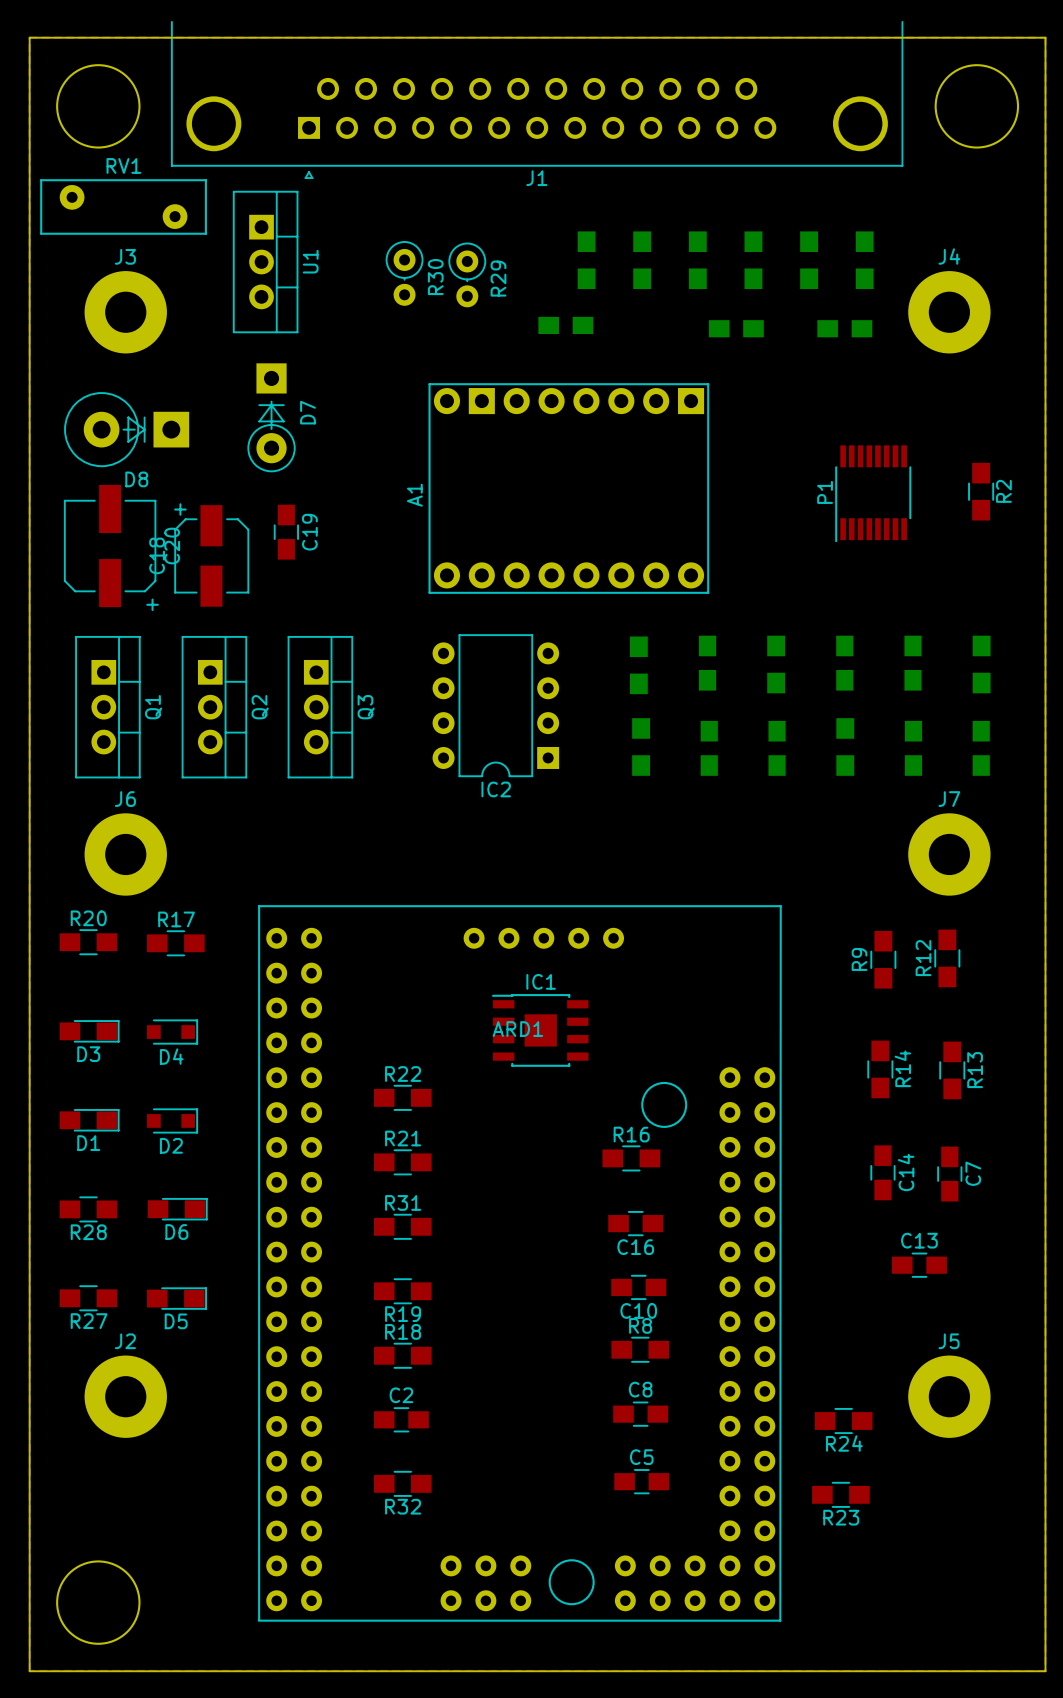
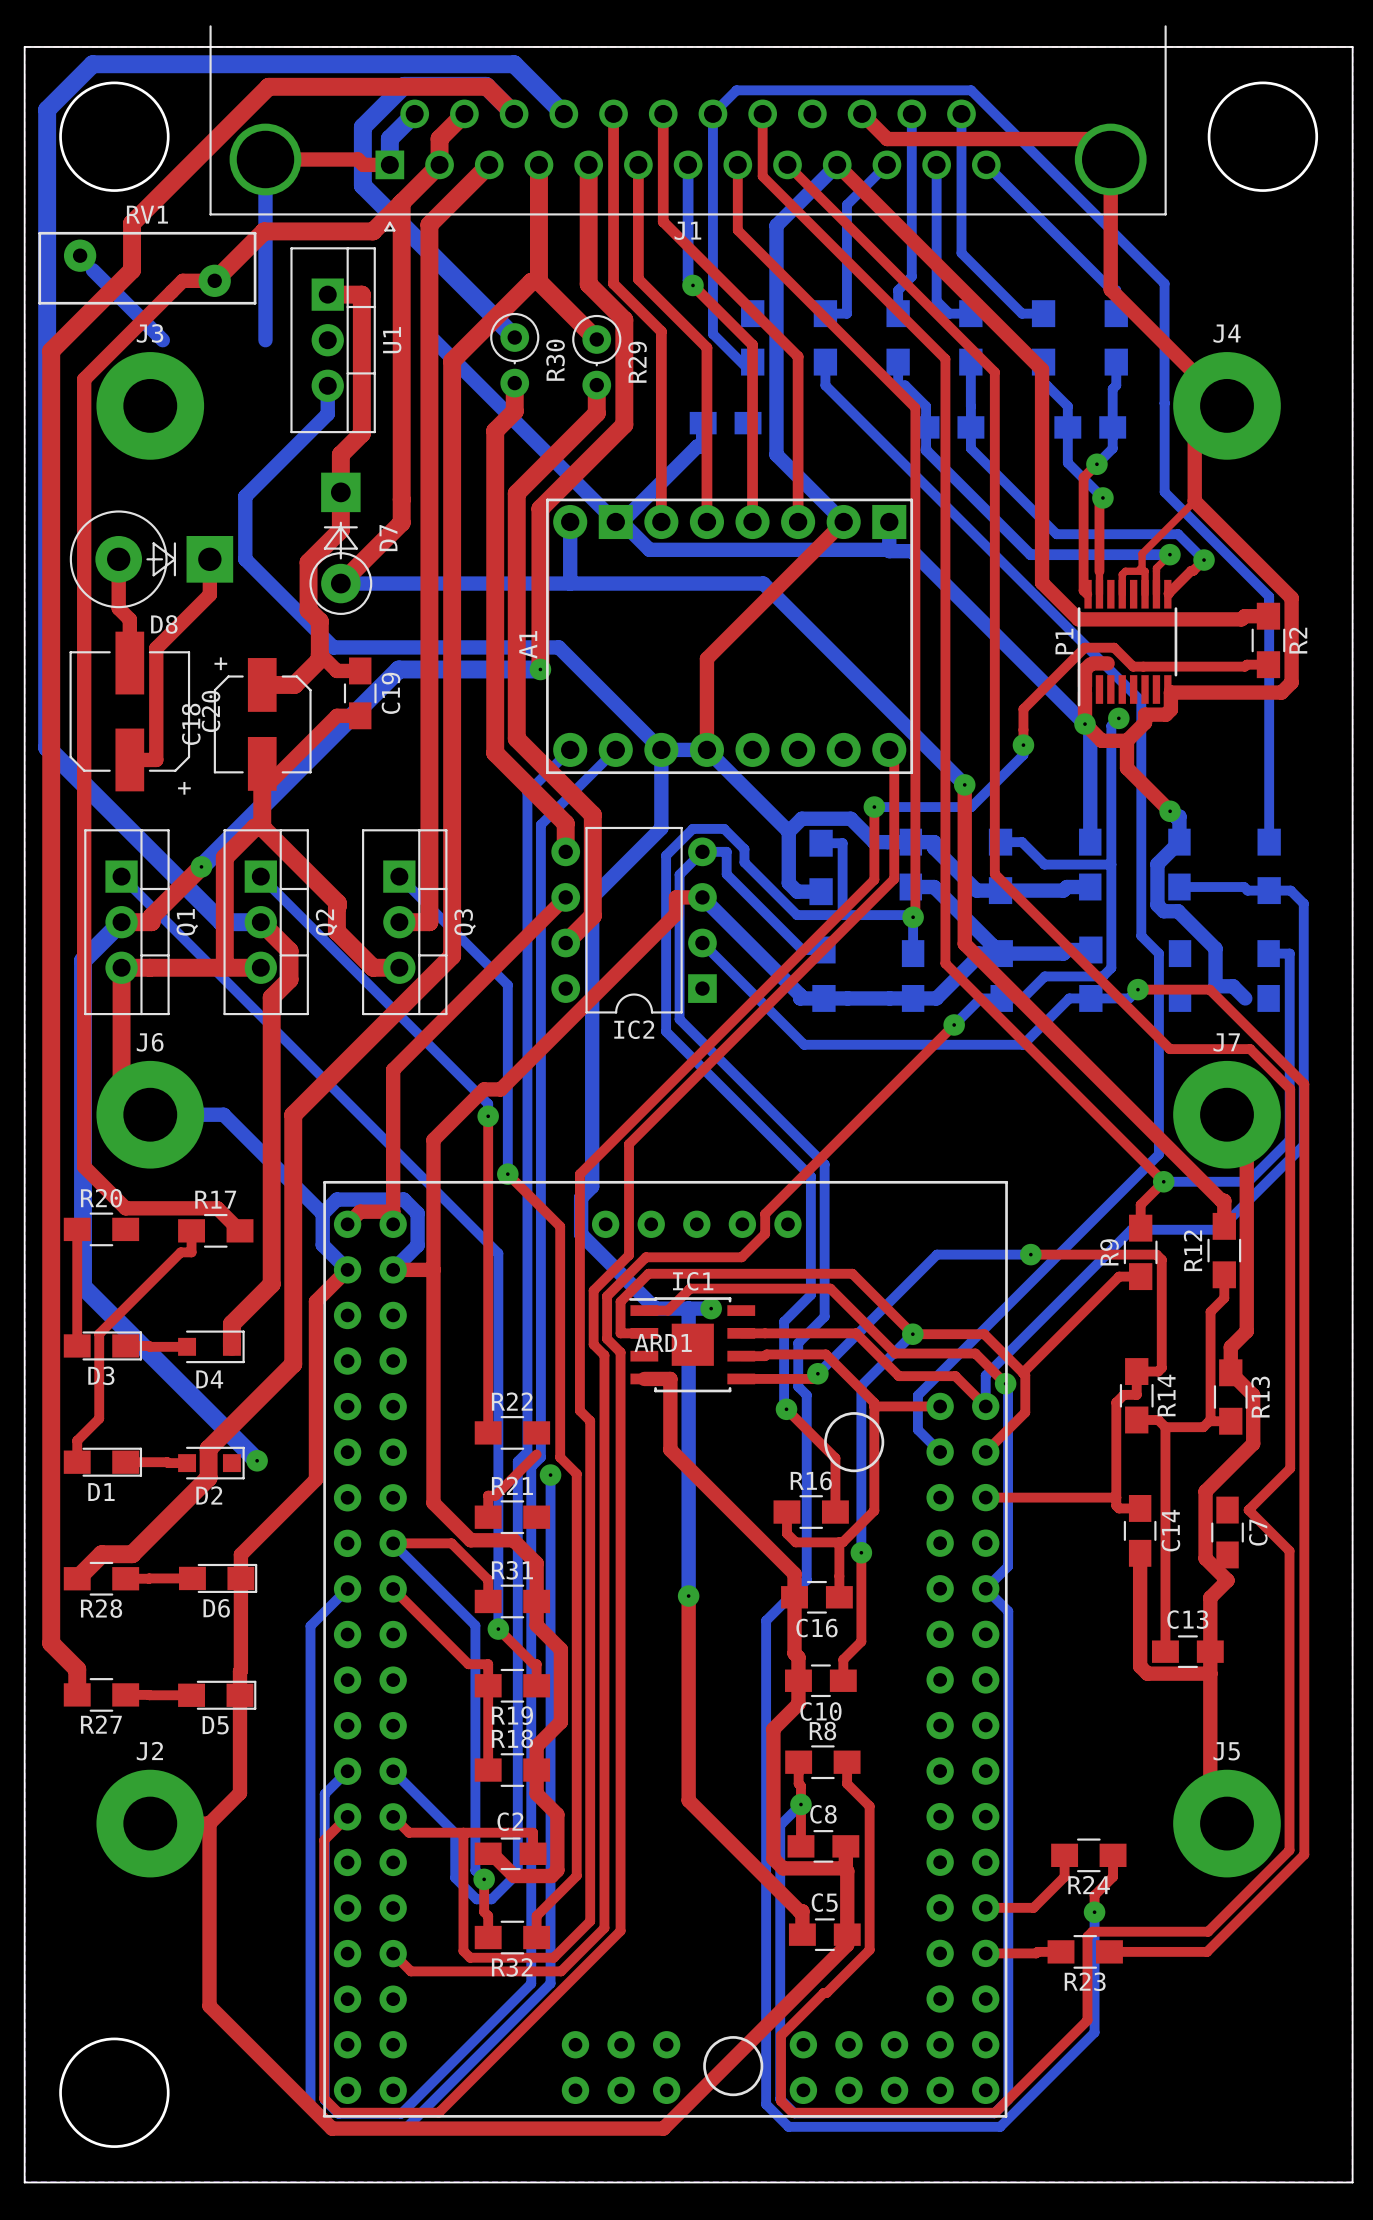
bottom track: none -> (414, 113) (389, 138) (389, 164)
top track: none -> (464, 113) (439, 138) (439, 164) (373, 231) (264, 231) (214, 280) (182, 280) (84, 379) (84, 1166) (125, 1208) (217, 1208) (240, 1230)
bottom track: none -> (514, 113) (486, 85) (404, 85) (362, 127) (362, 185) (514, 337)
top track: none -> (514, 113) (487, 86) (268, 86) (132, 223) (132, 270) (51, 350) (51, 1643) (77, 1669) (77, 1694)
bottom track: none -> (563, 113) (514, 64) (92, 64) (47, 109) (47, 747) (221, 922) (260, 922)
top track: none -> (613, 113) (613, 283) (661, 331) (661, 522)
top track: none -> (663, 113) (663, 221) (798, 356) (798, 522)
top track: none -> (762, 113) (762, 176) (945, 359) (945, 963) (1163, 1181) (1140, 1204) (1140, 1228)
top track: none -> (862, 113) (887, 139) (1090, 139) (1110, 159) (1110, 289) (1227, 405) (1194, 438) (1194, 501)
bottom track: none -> (911, 113) (911, 276) (898, 290) (898, 313)
bottom track: none -> (961, 113) (961, 253) (1022, 313) (1043, 313)
bottom track: none -> (265, 159) (265, 340)
top track: none -> (265, 159) (357, 159) (363, 164) (389, 164)
top track: none -> (489, 164) (429, 224) (429, 922) (399, 922)
top track: none -> (538, 164) (538, 281)
top track: none -> (588, 164) (588, 284) (624, 319) (624, 424) (540, 508) (540, 669)
top track: none -> (638, 164) (638, 279) (706, 347) (706, 522)
bottom track: none -> (688, 164) (688, 280) (692, 285)
top track: none -> (737, 164) (737, 230) (915, 407) (915, 914) (913, 917)
top track: none -> (787, 164) (994, 372) (994, 874) (1169, 1049) (1250, 1049) (1290, 1089) (1290, 1468) (1248, 1510) (1289, 1550) (1289, 1850) (1208, 1931) (1092, 1931) (1087, 1936) (1087, 2020) (995, 2112) (792, 2112) (780, 2101) (780, 2035) (869, 1949) (869, 1806) (847, 1783) (847, 1762)
bottom track: none -> (837, 164) (776, 225) (776, 454) (843, 522)
top track: none -> (837, 164) (1042, 369) (1042, 582) (1078, 619) (1241, 619) (1244, 616) (1268, 616)
bottom track: none -> (886, 164) (846, 204) (846, 313) (825, 313)
bottom track: none -> (936, 164) (936, 300) (949, 313) (970, 313)
bottom track: none -> (986, 164) (1111, 290) (1116, 290) (1116, 313)
top track: none -> (401, 202) (401, 522) (340, 583)
bottom track: none -> (92, 270) (162, 340)
top track: none -> (538, 281) (531, 281) (452, 361) (452, 956) (293, 1114) (293, 1364) (208, 1448) (208, 1477) (132, 1554) (101, 1554) (77, 1578)
top track: none -> (538, 281) (596, 339)
top track: none -> (692, 285) (752, 344) (752, 522)
via: none -> (692, 285)
top track: none -> (327, 294) (361, 294) (361, 433) (340, 454) (340, 530) (308, 562) (308, 610) (319, 621) (319, 659) (294, 684) (262, 684)
bottom track: none -> (433, 340) (615, 522) (621, 522)
bottom track: none -> (825, 362) (825, 385) (1141, 701) (1141, 935) (1158, 953) (1158, 1154) (917, 1395) (917, 1429) (940, 1452)
bottom track: none -> (898, 362) (898, 385) (905, 385) (926, 406) (926, 450) (1030, 554) (1169, 554)
bottom track: none -> (970, 362) (970, 448) (1056, 534) (1178, 534) (1204, 560)
bottom track: none -> (1043, 362) (1043, 385) (1046, 385) (1067, 406) (1067, 462) (1102, 497)
bottom track: none -> (1116, 362) (1116, 385) (1112, 389) (1112, 448) (1096, 464)
bottom track: none -> (752, 373) (712, 334) (712, 113) (736, 90) (971, 90) (1164, 283) (1164, 492) (1269, 596) (1269, 842)
top track: none -> (514, 383) (514, 411) (495, 430) (495, 753) (565, 823) (565, 851)
bottom track: none -> (327, 385) (327, 414) (245, 496) (245, 559) (333, 647) (558, 647) (661, 749)
top track: none -> (596, 385) (596, 413) (516, 493) (516, 738) (592, 814) (592, 915) (565, 943)
bottom track: none -> (703, 423) (703, 446) (697, 446) (621, 522)
top track: none -> (1096, 464) (1083, 477) (1083, 590) (1088, 594)
via: none -> (1096, 464)
top track: none -> (1102, 497) (1099, 501) (1099, 594)
via: none -> (1102, 497)
top track: none -> (1194, 501) (1291, 598) (1291, 682) (1281, 692) (1170, 692)
top track: none -> (1194, 501) (1142, 553) (1142, 571) (1139, 569)
bottom track: none -> (570, 522) (570, 583)
bottom track: none -> (621, 522) (649, 549) (889, 549)
top track: none -> (843, 522) (706, 658) (706, 749)
bottom track: none -> (889, 522) (889, 551) (912, 551) (1090, 729) (1090, 842)
top track: none -> (1169, 554) (1156, 568) (1156, 594)
via: none -> (1169, 554)
top track: none -> (118, 559) (118, 608) (129, 619) (129, 663)
top track: none -> (209, 559) (209, 594) (156, 648) (156, 759) (129, 759)
top track: none -> (1204, 560) (1168, 594)
via: none -> (1204, 560)
bottom track: none -> (340, 583) (763, 583) (964, 784)
top track: none -> (1122, 594) (1122, 574) (1125, 571) (1145, 571) (1145, 594)
top track: none -> (319, 653) (336, 670) (360, 670)
top track: none -> (1090, 664) (1085, 669) (1085, 686) (1088, 689) (1085, 692) (1085, 724) (1101, 740) (1127, 740)
top track: none -> (1093, 663) (1107, 663)
top track: none -> (1268, 664) (1246, 664) (1244, 666) (1133, 666) (1114, 647) (1084, 647) (1023, 709) (1023, 745)
bottom track: none -> (540, 669) (398, 669) (201, 866)
via: none -> (540, 669)
top track: none -> (1170, 692) (1170, 709) (1165, 714) (1145, 714) (1145, 722) (1127, 740)
top track: none -> (360, 715) (336, 715) (269, 783) (262, 783) (262, 763) (262, 827)
bottom track: none -> (1118, 718) (1111, 725) (1111, 967) (1102, 976) (1044, 976) (1022, 998) (980, 998) (954, 1024)
via: none -> (1118, 718)
via: none -> (1085, 724)
top track: none -> (1127, 740) (1127, 768) (1170, 811)
bottom track: none -> (1023, 745) (1023, 754) (971, 807) (874, 807)
via: none -> (1023, 745)
bottom track: none -> (570, 749) (527, 792) (527, 1451) (517, 1461) (517, 1873) (491, 1899) (476, 1899) (455, 1877) (455, 1833) (393, 1771)
bottom track: none -> (615, 749) (540, 824) (540, 1457) (531, 1467) (531, 1983) (401, 2113) (338, 2113) (324, 2099) (324, 1794) (347, 1771)
bottom track: none -> (661, 749) (661, 828) (592, 897) (592, 1186) (581, 1197) (581, 1234) (655, 1308) (711, 1308)
bottom track: none -> (661, 749) (706, 749) (788, 831)
top track: none -> (889, 749) (894, 754) (894, 878) (629, 1144) (629, 1255) (593, 1290) (593, 1344) (604, 1355) (604, 1928) (561, 1971) (410, 1971) (393, 1953)
top track: none -> (964, 784) (964, 943) (1221, 1200) (1224, 1200) (1224, 1226)
via: none -> (964, 784)
top track: none -> (874, 807) (874, 879) (579, 1174) (579, 1410) (590, 1420) (590, 1921) (553, 1957) (470, 1957) (463, 1951) (463, 1832)
via: none -> (874, 807)
bottom track: none -> (1170, 811) (1175, 816) (1179, 816) (1179, 842) (1157, 864) (1157, 904) (1163, 911) (1178, 911) (1215, 948) (1215, 986) (1233, 986) (1245, 998)
via: none -> (1170, 811)
top track: none -> (262, 827) (337, 903) (336, 931) (373, 967) (399, 967)
top track: none -> (262, 827) (254, 827) (224, 857) (224, 965) (222, 967)
bottom track: none -> (788, 831) (801, 818) (850, 818) (874, 842) (934, 842) (934, 847) (976, 890) (1063, 890) (1066, 887) (1090, 887)
bottom track: none -> (788, 831) (788, 883) (797, 891) (821, 891)
bottom track: none -> (1000, 842) (1022, 842) (1044, 864) (1111, 864)
bottom track: none -> (821, 843) (842, 843) (842, 915)
top track: none -> (201, 866) (151, 916) (151, 922) (121, 922)
via: none -> (201, 866)
bottom track: none -> (121, 876) (498, 1253) (498, 1629)
bottom track: none -> (260, 876) (488, 1103) (488, 1116)
bottom track: none -> (399, 876) (507, 985) (507, 1174)
bottom track: none -> (910, 887) (934, 887) (992, 945) (992, 953)
bottom track: none -> (1179, 887) (1244, 887) (1247, 890) (1290, 890) (1303, 903) (1303, 1145) (1219, 1229) (1131, 1229) (985, 1375) (985, 1406)
top track: none -> (565, 897) (393, 1069) (393, 1224)
bottom track: none -> (702, 897) (800, 995) (800, 998) (936, 998) (978, 956) (978, 953) (1063, 953) (1067, 950) (1090, 950)
top track: none -> (702, 897) (675, 897) (675, 914) (500, 1089) (484, 1089) (433, 1140) (433, 1503) (470, 1540) (513, 1540) (536, 1563) (536, 1625) (560, 1649) (560, 1722) (536, 1746) (536, 1793) (557, 1814) (557, 1870) (551, 1876) (514, 1876) (491, 1853) (488, 1853)
via: none -> (913, 917)
bottom track: none -> (121, 922) (83, 960) (83, 1286) (257, 1460)
top track: none -> (260, 922) (289, 950) (289, 979) (271, 997) (271, 1284) (231, 1323) (231, 1346)
bottom track: none -> (702, 943) (804, 1044) (1023, 1044) (1069, 998) (1129, 998) (1137, 989)
bottom track: none -> (823, 950) (802, 950) (726, 874) (726, 851) (702, 851) (679, 874) (679, 1019) (824, 1164) (824, 1316) (798, 1343) (798, 1386) (806, 1395) (806, 1580) (766, 1620) (766, 2104) (788, 2126) (1000, 2126) (1094, 2032) (1094, 1912)
bottom track: none -> (913, 953) (913, 917) (910, 915) (797, 915) (744, 862) (744, 849) (724, 828) (692, 828) (666, 855) (666, 1031) (810, 1176) (810, 1294) (784, 1321) (784, 1406) (786, 1409)
bottom track: none -> (1268, 953) (1289, 953) (1289, 1140) (1248, 1181) (1163, 1181)
top track: none -> (260, 967) (121, 967) (121, 1086) (149, 1114)
top track: none -> (1137, 989) (1209, 989) (1304, 1084) (1304, 1854) (1207, 1951) (1109, 1951)
via: none -> (1137, 989)
top track: none -> (954, 1024) (765, 1213) (765, 1233) (741, 1257) (645, 1257) (607, 1296) (607, 1338) (620, 1352) (620, 1930) (438, 2112) (338, 2112) (324, 2098) (324, 1840) (347, 1816)
via: none -> (954, 1024)
bottom track: none -> (150, 1114) (223, 1114) (322, 1213)
top track: none -> (1227, 1114) (1246, 1134) (1246, 1331) (1230, 1347) (1230, 1372) (1253, 1395) (1253, 1443) (1205, 1491) (1205, 1558) (1227, 1580) (1210, 1597) (1210, 1806) (1227, 1823)
top track: none -> (488, 1116) (488, 1432)
via: none -> (488, 1116)
top track: none -> (507, 1174) (560, 1226) (560, 1457) (576, 1473) (576, 1875) (536, 1916) (536, 1937)
via: none -> (507, 1174)
via: none -> (1163, 1181)
top track: none -> (393, 1211) (360, 1211) (347, 1224)
bottom track: none -> (322, 1213) (336, 1199) (403, 1199) (417, 1213) (417, 1245) (393, 1269)
bottom track: none -> (322, 1213) (322, 1245) (347, 1269)
top track: none -> (77, 1229) (77, 1345)
top track: none -> (191, 1230) (191, 1252) (180, 1252) (99, 1333) (99, 1418) (77, 1440) (77, 1462)
bottom track: none -> (1030, 1254) (937, 1254) (817, 1373)
top track: none -> (1030, 1254) (1156, 1254) (1161, 1259) (1161, 1368) (1158, 1371) (1136, 1371) (1136, 1394) (1123, 1394) (1116, 1402) (1116, 1505) (1119, 1508) (1140, 1508)
via: none -> (1030, 1254)
top track: none -> (347, 1269) (315, 1301) (315, 1479) (240, 1554) (240, 1793) (209, 1823)
top track: none -> (393, 1269) (433, 1269)
top track: none -> (1224, 1274) (1224, 1298) (1210, 1311) (1210, 1421)
top track: none -> (1140, 1276) (1119, 1276) (1022, 1372)
bottom track: none -> (688, 1308) (688, 1596)
via: none -> (711, 1308)
top track: none -> (644, 1310) (668, 1310) (690, 1288) (830, 1288) (895, 1353) (975, 1353) (1005, 1383)
top track: none -> (644, 1333) (620, 1333) (620, 1301) (648, 1273) (852, 1273) (912, 1334) (984, 1334) (1025, 1375) (1025, 1412) (985, 1452)
top track: none -> (741, 1333) (856, 1333) (898, 1376) (955, 1376) (985, 1406)
bottom track: none -> (912, 1334) (861, 1385) (861, 1552)
via: none -> (912, 1334)
top track: none -> (125, 1345) (187, 1346)
top track: none -> (741, 1356) (825, 1354) (874, 1402) (874, 1510) (842, 1542) (795, 1542) (786, 1533) (786, 1512)
top track: none -> (817, 1373) (812, 1378) (741, 1378)
via: none -> (817, 1373)
top track: none -> (644, 1378) (670, 1378) (670, 1449) (794, 1573) (794, 1653) (798, 1657) (798, 1704) (773, 1729) (773, 1858) (783, 1868) (845, 1868)
bottom track: none -> (1005, 1383) (1008, 1386) (1008, 1566) (985, 1588) (1008, 1611) (1008, 2099) (994, 2113) (794, 2113) (780, 2099) (780, 1825) (800, 1804)
via: none -> (1005, 1383)
top track: none -> (874, 1406) (940, 1406)
top track: none -> (786, 1409) (835, 1458) (835, 1512)
via: none -> (786, 1409)
top track: none -> (1136, 1419) (1158, 1419) (1165, 1427)
top track: none -> (1230, 1421) (1209, 1421) (1203, 1427) (1165, 1427)
top track: none -> (1165, 1427) (1165, 1651)
top track: none -> (536, 1454) (495, 1495) (488, 1495) (488, 1517)
via: none -> (257, 1460)
top track: none -> (125, 1462) (187, 1463)
bottom track: none -> (550, 1475) (550, 1983) (405, 2128) (333, 2128) (310, 2105) (310, 1626) (347, 1588)
via: none -> (550, 1475)
top track: none -> (985, 1497) (1116, 1497)
top track: none -> (839, 1542) (839, 1597)
bottom track: none -> (393, 1543) (475, 1625) (475, 1870) (484, 1879)
top track: none -> (393, 1543) (451, 1543) (488, 1579) (488, 1601)
top track: none -> (861, 1552) (861, 1641) (843, 1659) (843, 1680)
via: none -> (861, 1552)
top track: none -> (1140, 1553) (1140, 1666) (1147, 1673) (1210, 1673)
top track: none -> (192, 1578) (125, 1578)
top track: none -> (393, 1588) (468, 1664) (488, 1664) (488, 1770)
top track: none -> (688, 1596) (688, 1800) (799, 1911) (802, 1911) (802, 1934)
via: none -> (688, 1596)
top track: none -> (498, 1629) (533, 1664) (536, 1664) (536, 1685)
via: none -> (498, 1629)
top track: none -> (125, 1694) (191, 1695)
top track: none -> (798, 1762) (798, 1783) (800, 1786) (800, 1846)
via: none -> (800, 1804)
top track: none -> (393, 1816) (409, 1832) (533, 1832) (533, 1853)
top track: none -> (209, 1823) (209, 2006) (332, 2128) (663, 2128) (847, 1944) (845, 1846)
top track: none -> (1064, 1855) (1064, 1876) (1033, 1907) (985, 1907)
top track: none -> (1113, 1855) (1113, 1876) (1094, 1895) (1094, 1912)
top track: none -> (484, 1879) (484, 1911) (488, 1916) (488, 1937)
via: none -> (484, 1879)
via: none -> (1094, 1912)
top track: none -> (1061, 1951) (985, 1953)

